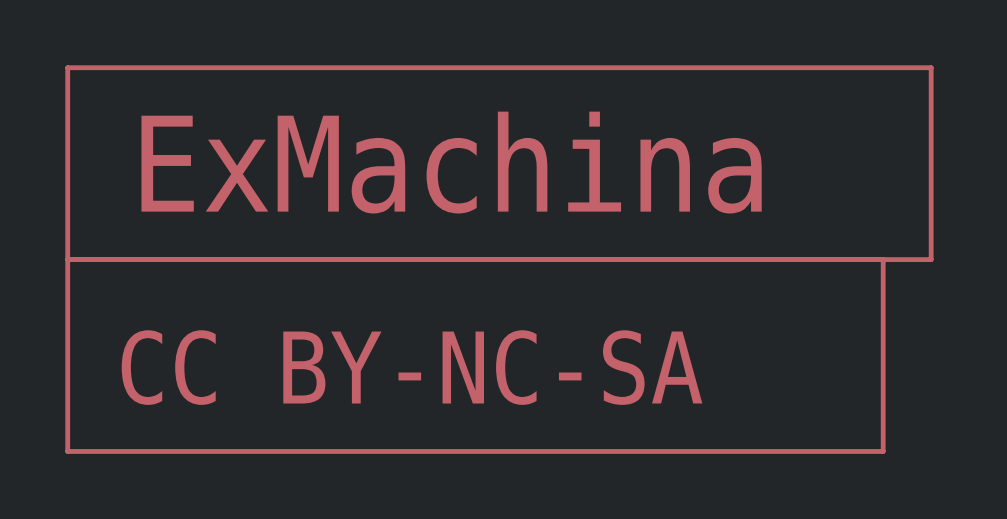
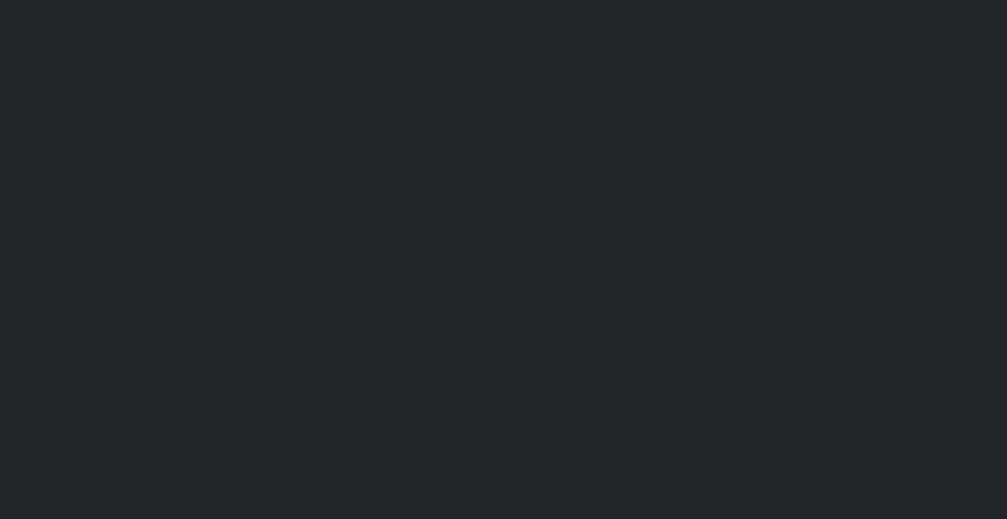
part: (499, 163) -> none
part: (475, 355) -> none

